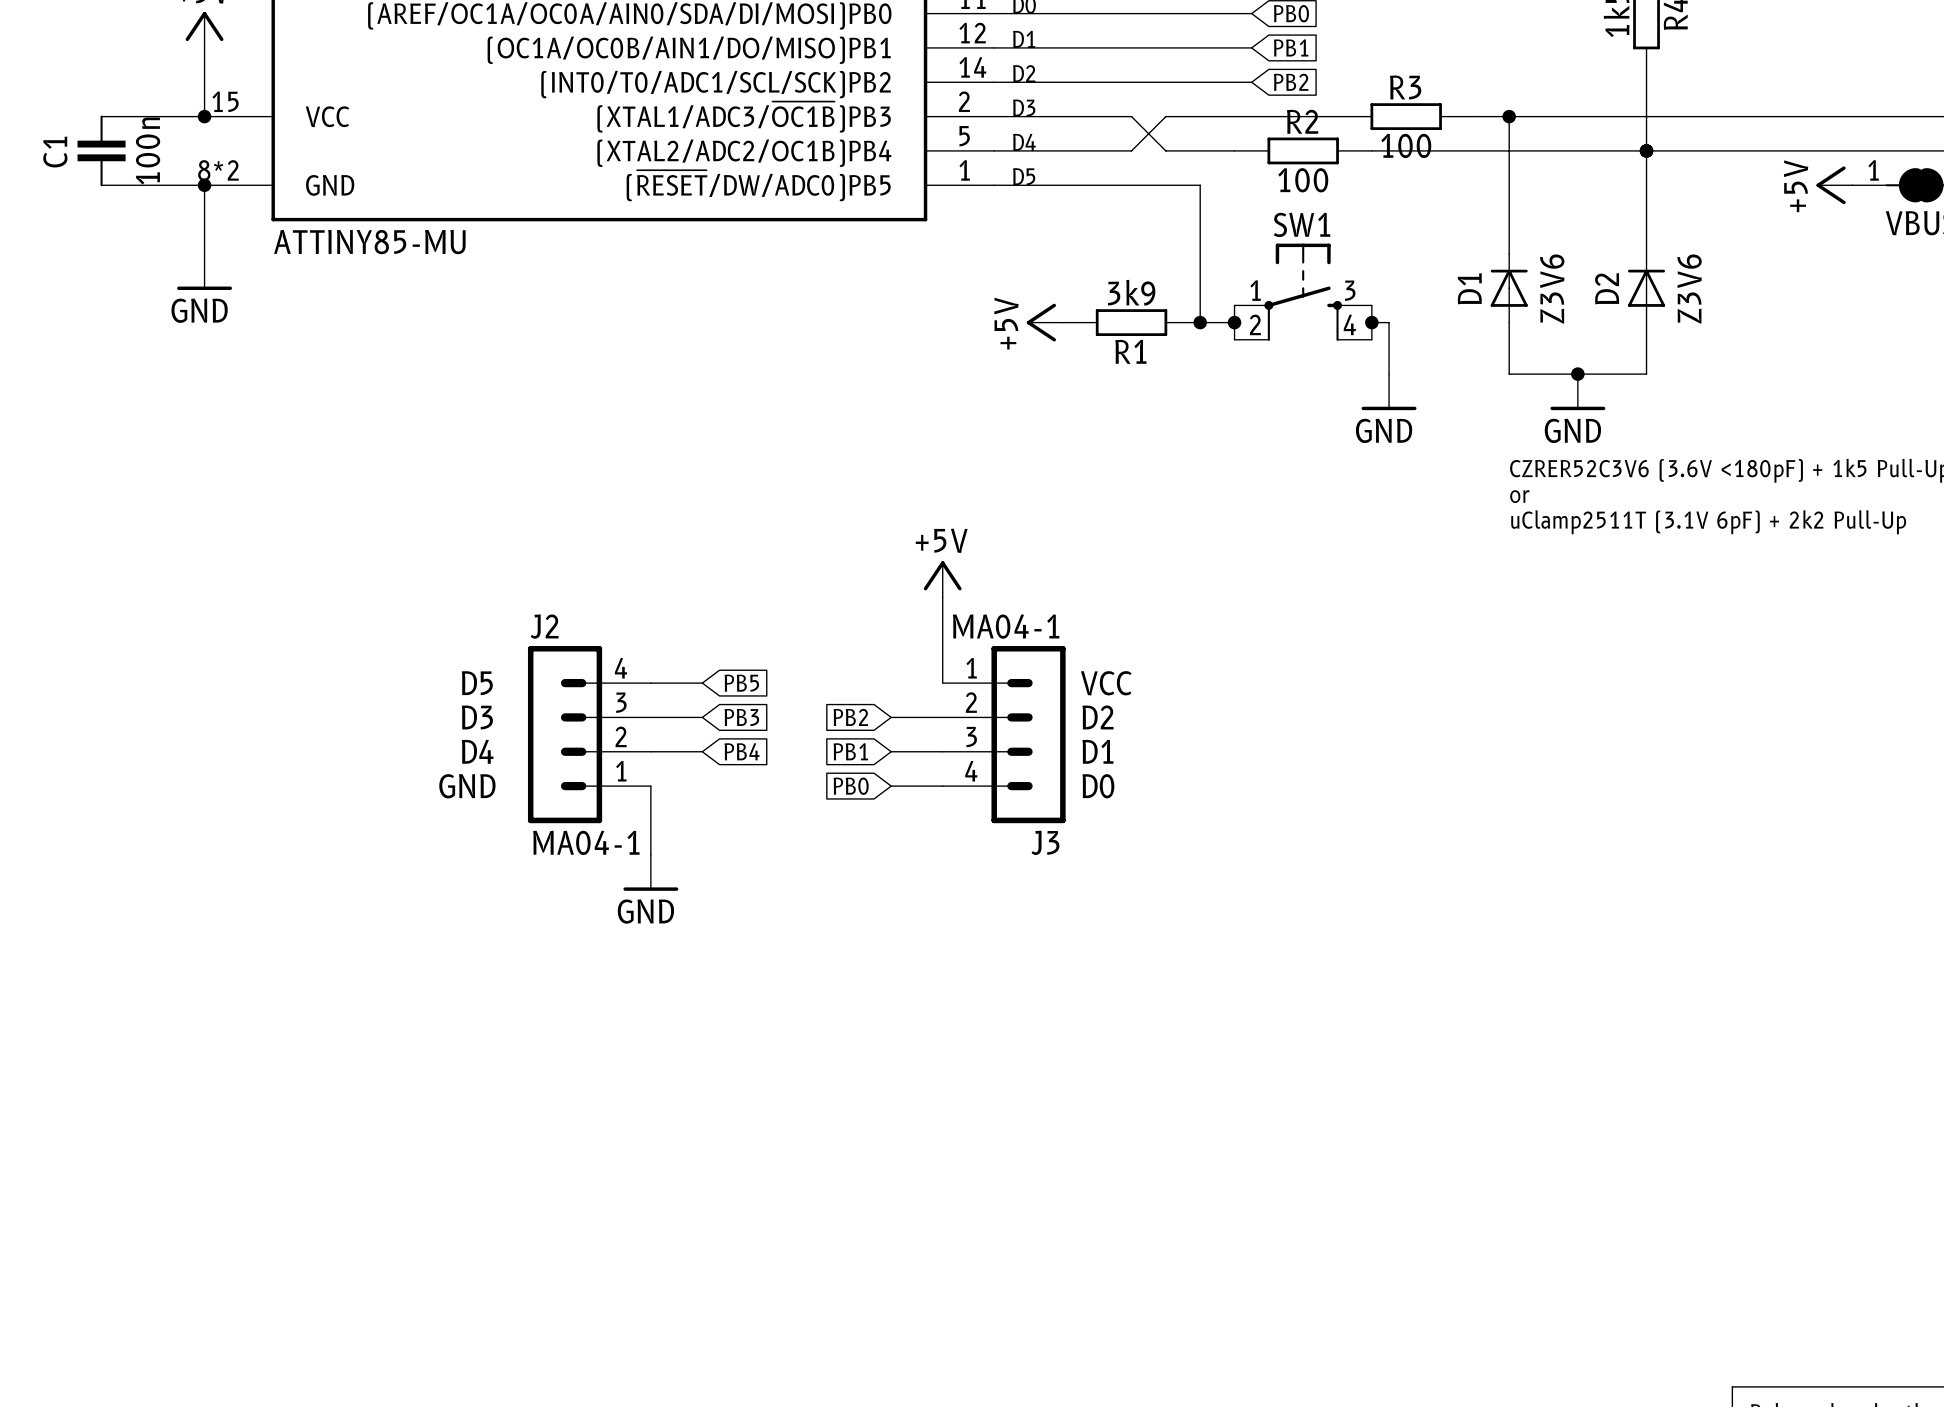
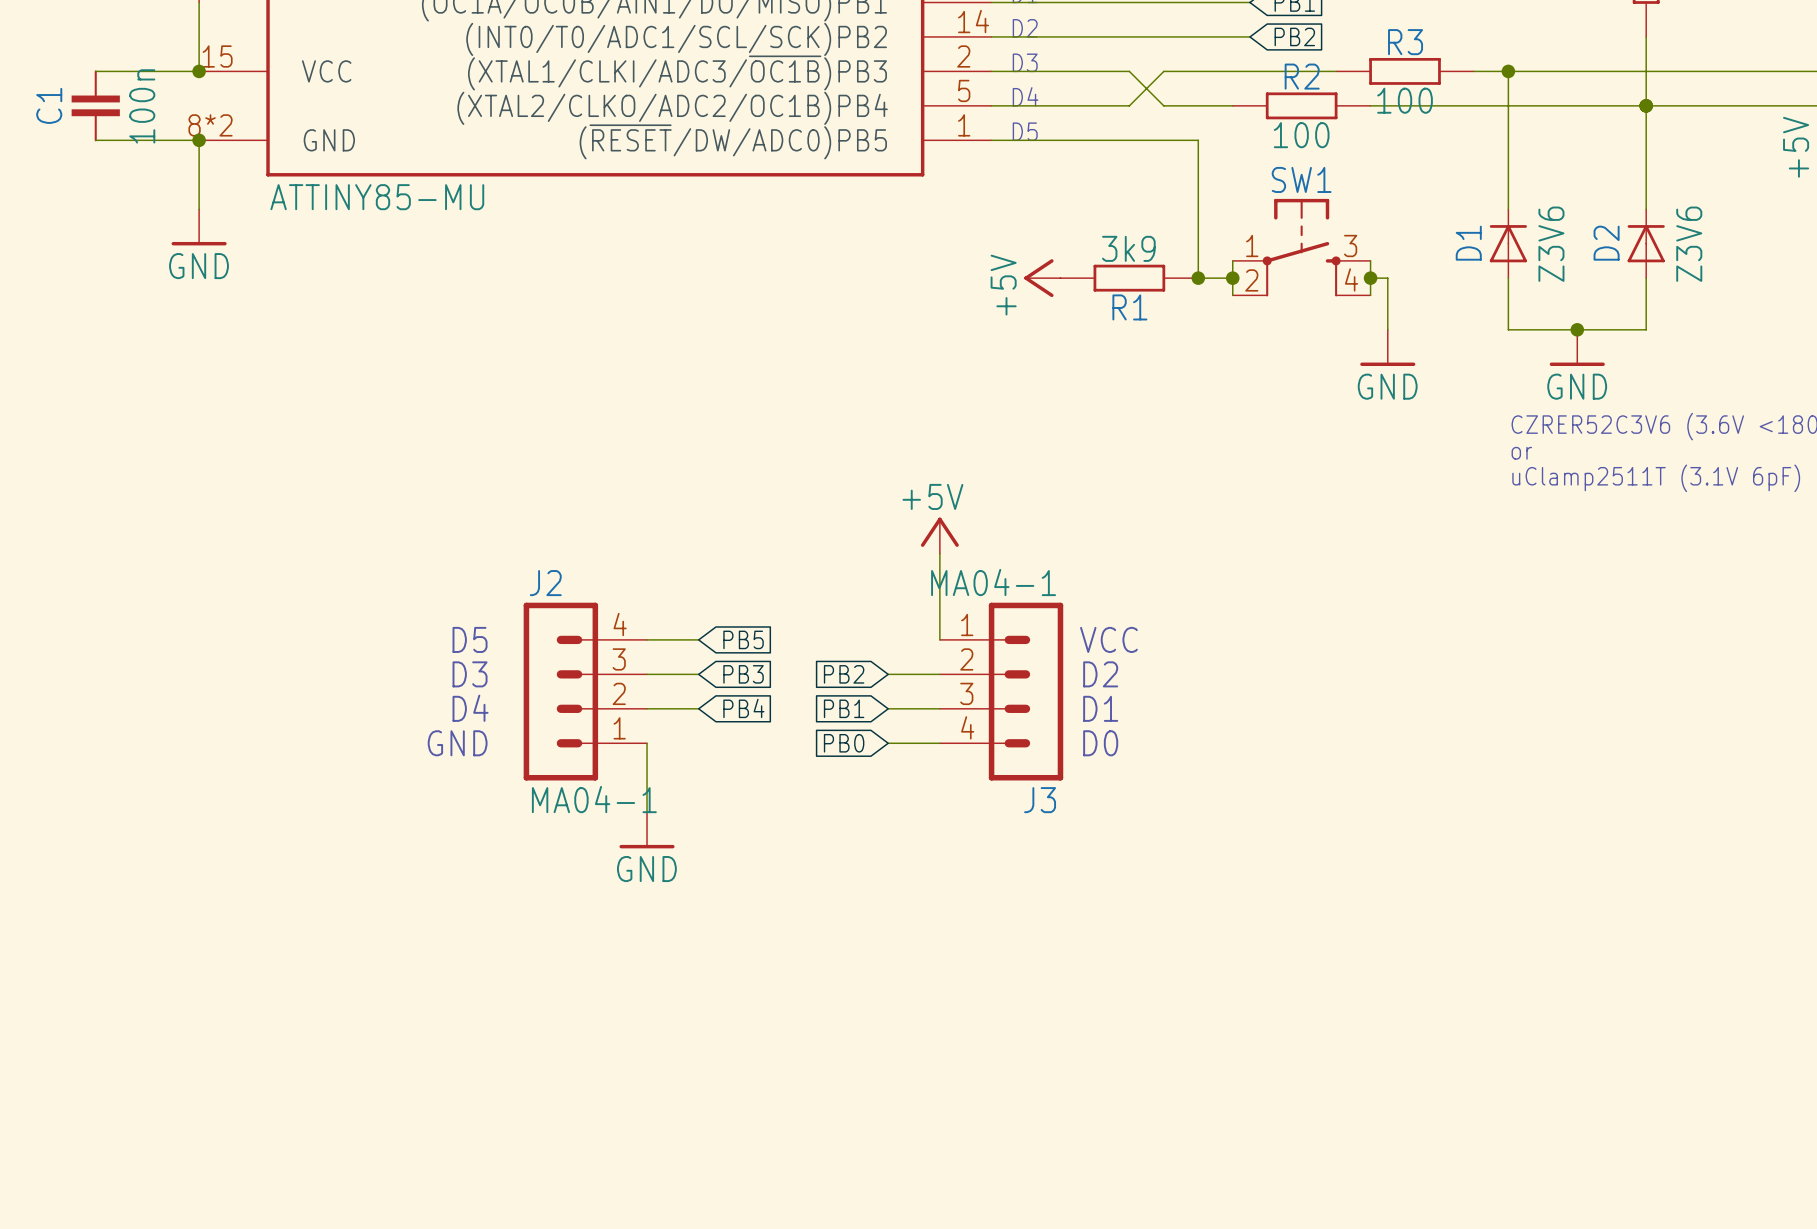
part pin name: (XTAL1/ADC3/~{OC1B})PB3 (744, 117) -> (XTAL1/CLKI/ADC3/~{OC1B})PB3 (677, 72)
part pin name: (XTAL2/ADC2/OC1B)PB4 (744, 153) -> (XTAL2/CLKO/ADC2/OC1B)PB4 (672, 108)

